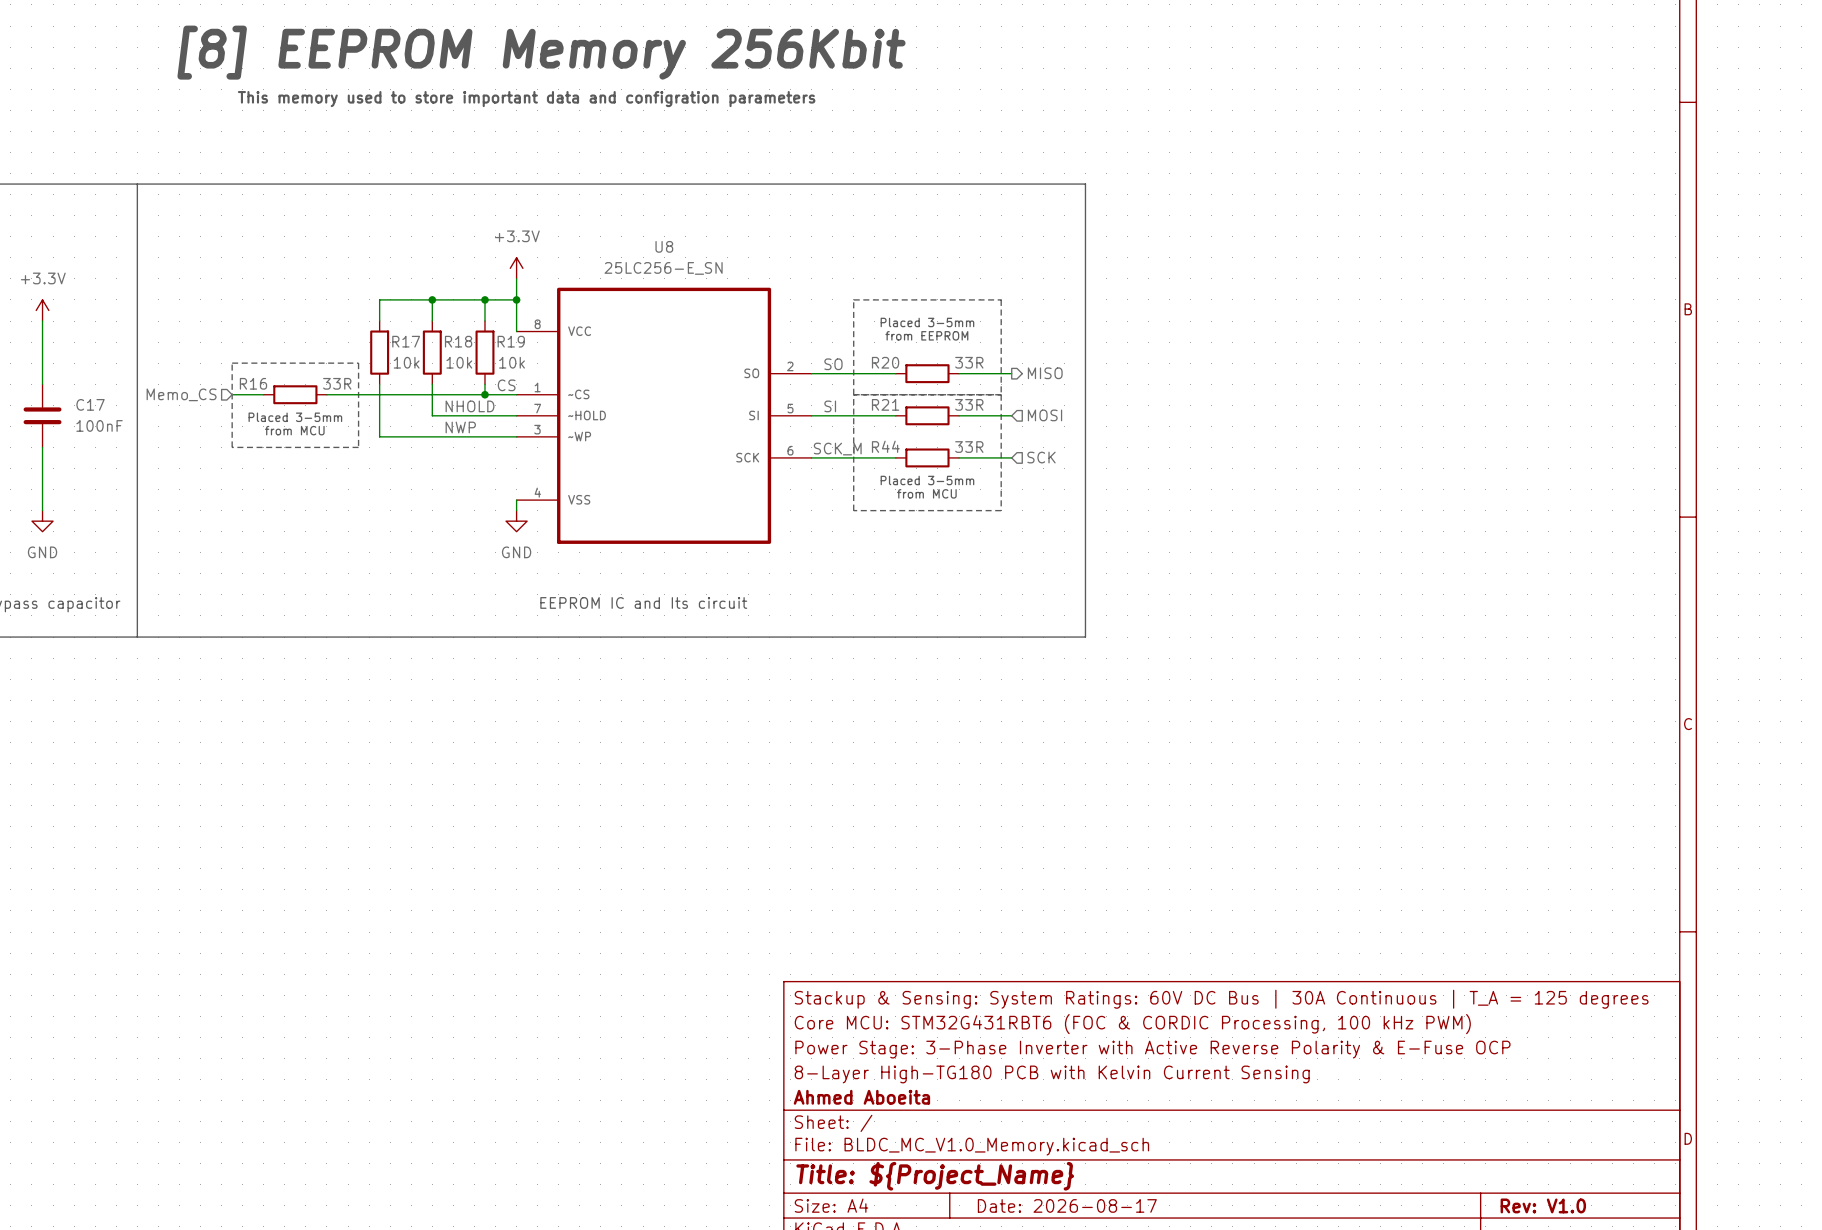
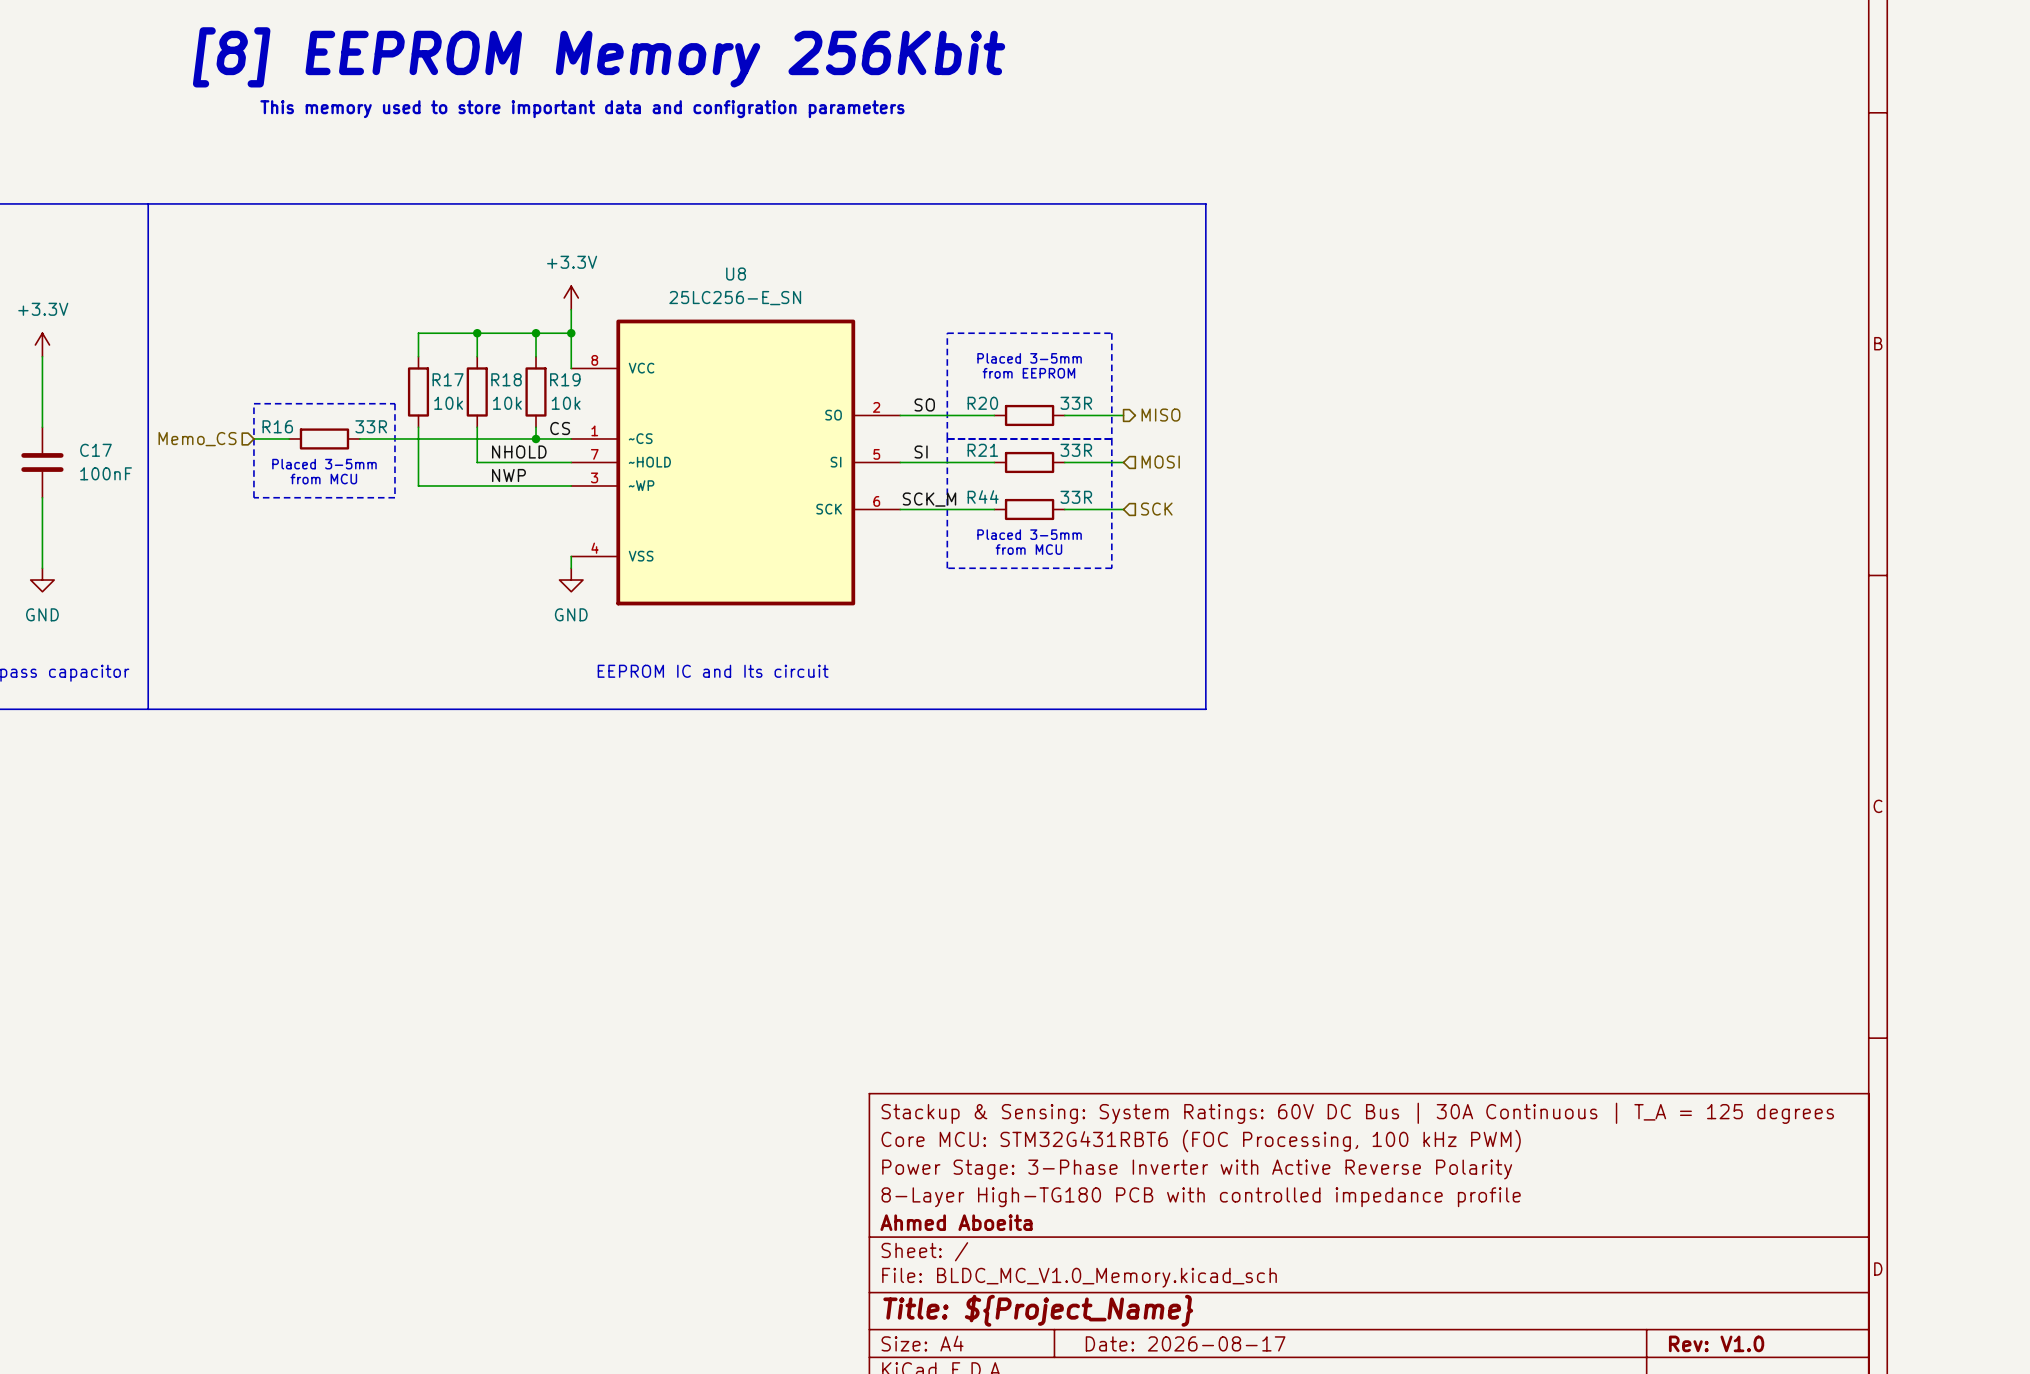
title block: Core MCU: STM32G431RBT6 (FOC & CORDIC Processing, 100 kHz PWM) (1132, 1024) -> Core MCU: STM32G431RBT6 (FOC Processing, 100 kHz PWM) (1201, 1141)
title block: Power Stage: 3-Phase Inverter with Active Reverse Polarity & E-Fuse OCP (1152, 1049) -> Power Stage: 3-Phase Inverter with Active Reverse Polarity (1197, 1169)
title block: 8-Layer High-TG180 PCB with Kelvin Current Sensing (1052, 1074) -> 8-Layer High-TG180 PCB with controlled impedance profile (1201, 1197)

